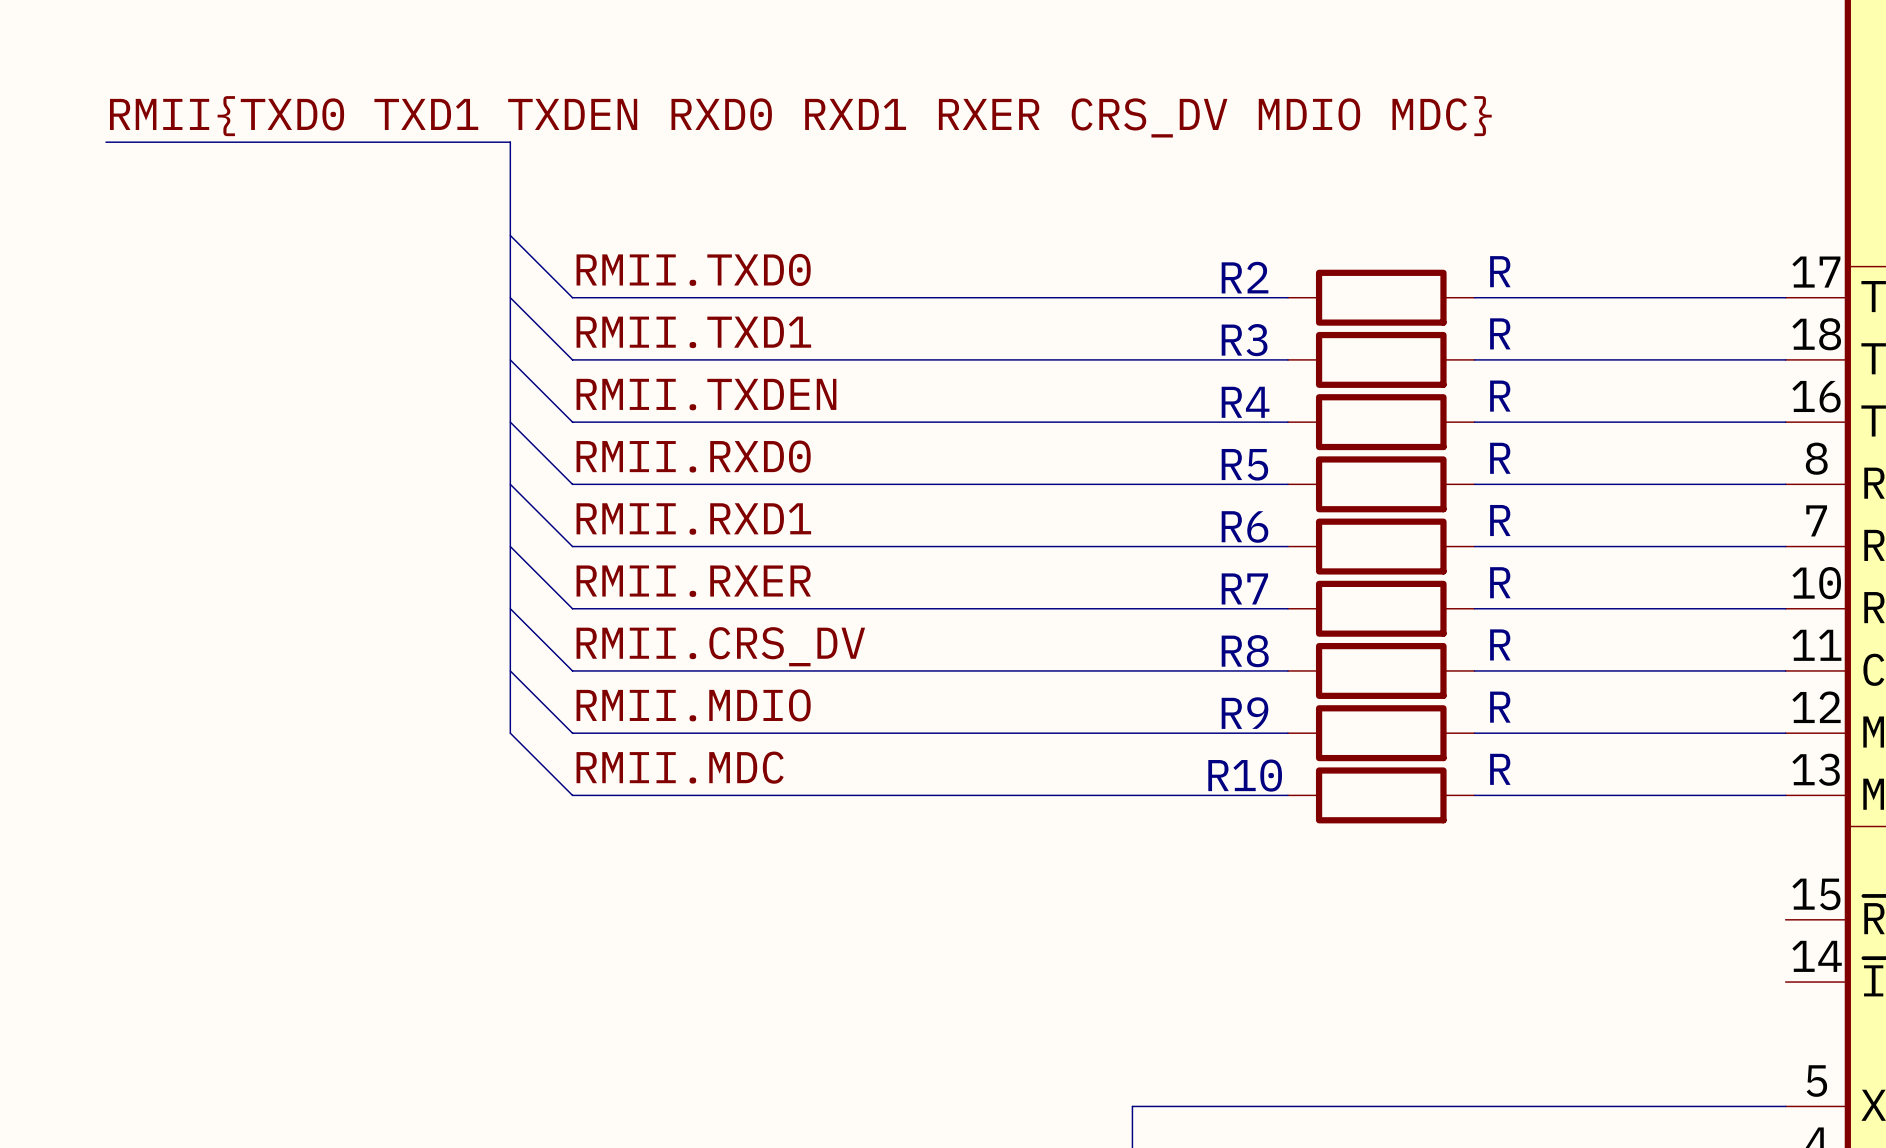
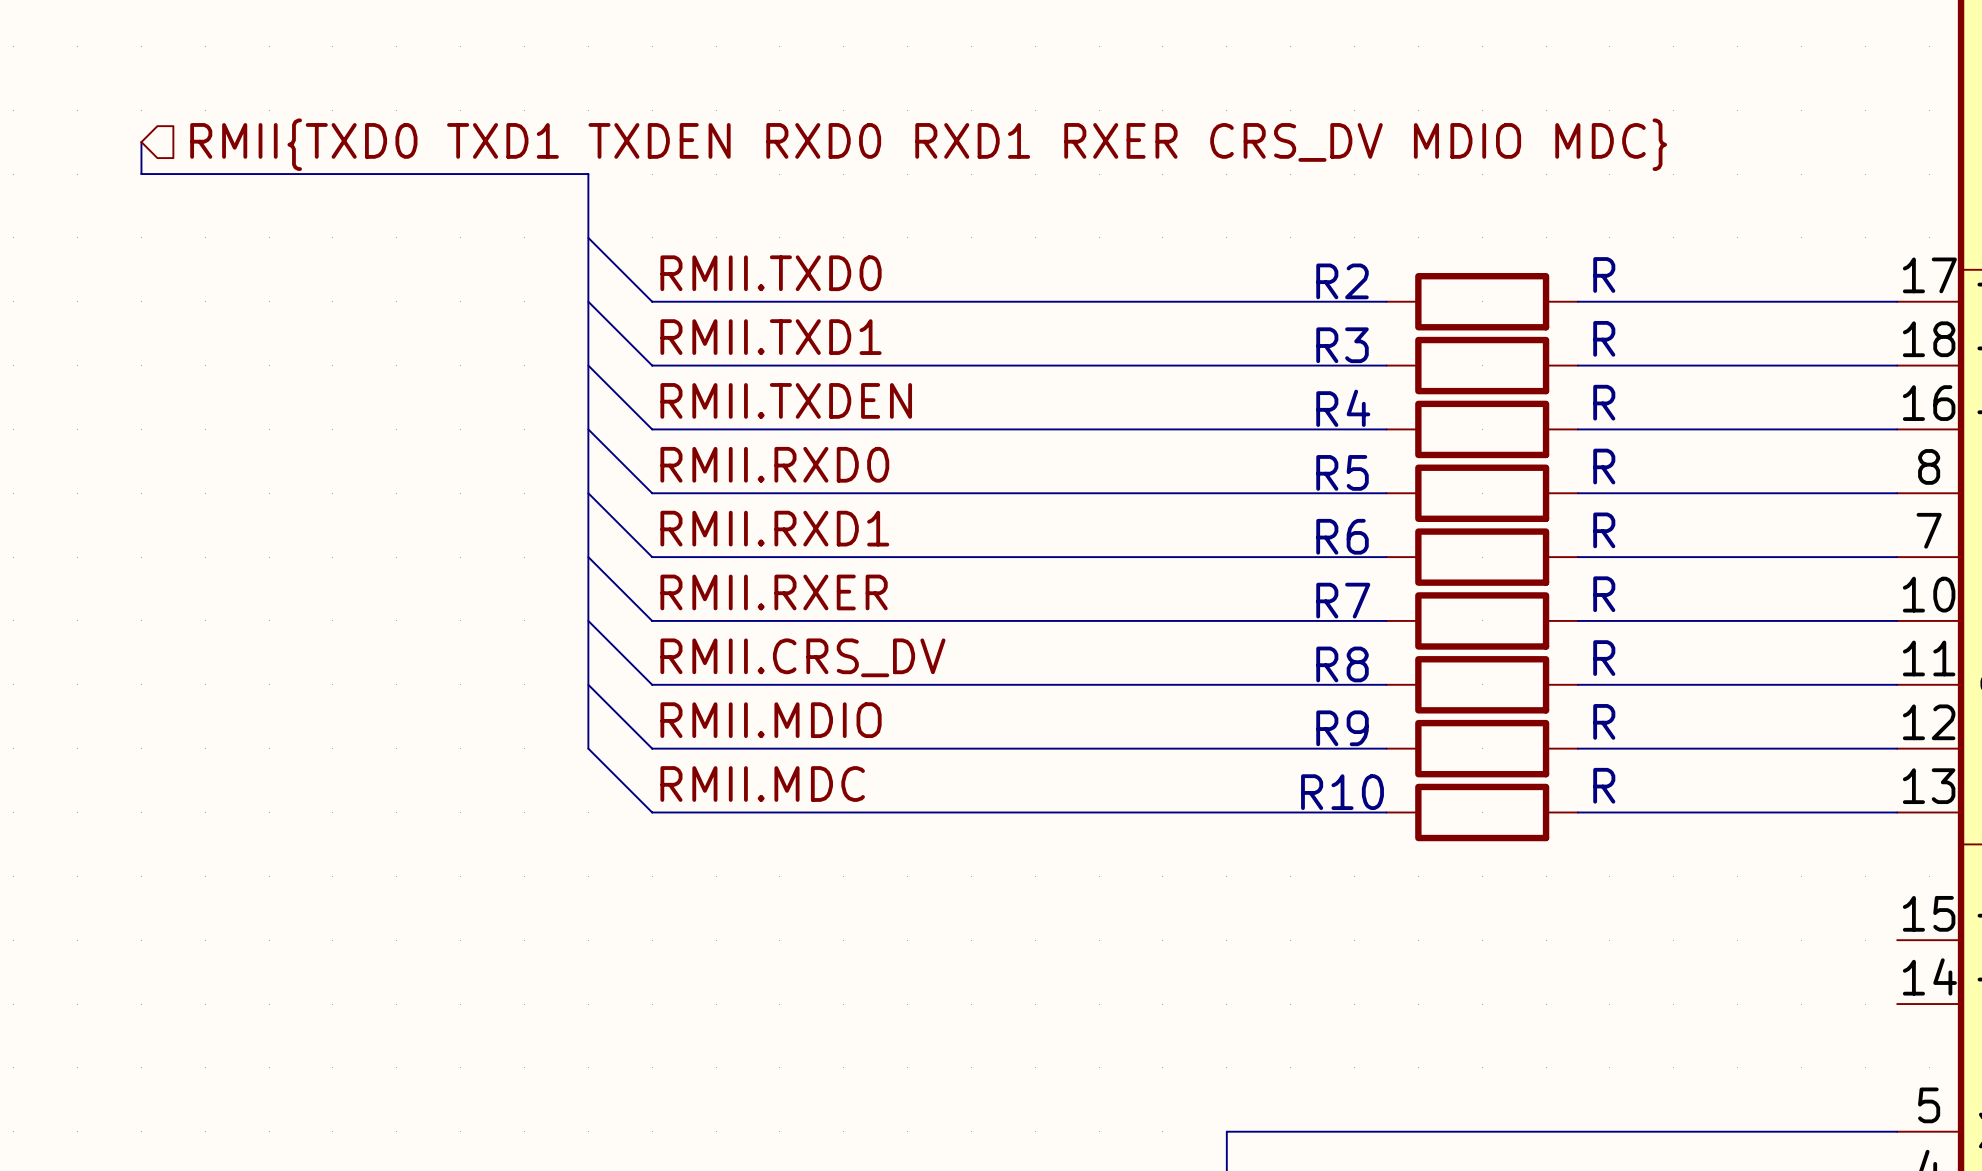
label: RMII{TXD0 TXD1 TXDEN RXD0 RXD1 RXER CRS_DV MDIO MDC} (800, 116) -> none
bus: (105, 142) (510, 142) (510, 173) -> (141, 142) (141, 174) (588, 174)
hierarchical label: none -> RMII{TXD0 TXD1 TXDEN RXD0 RXD1 RXER CRS_DV MDIO MDC} (928, 144)

